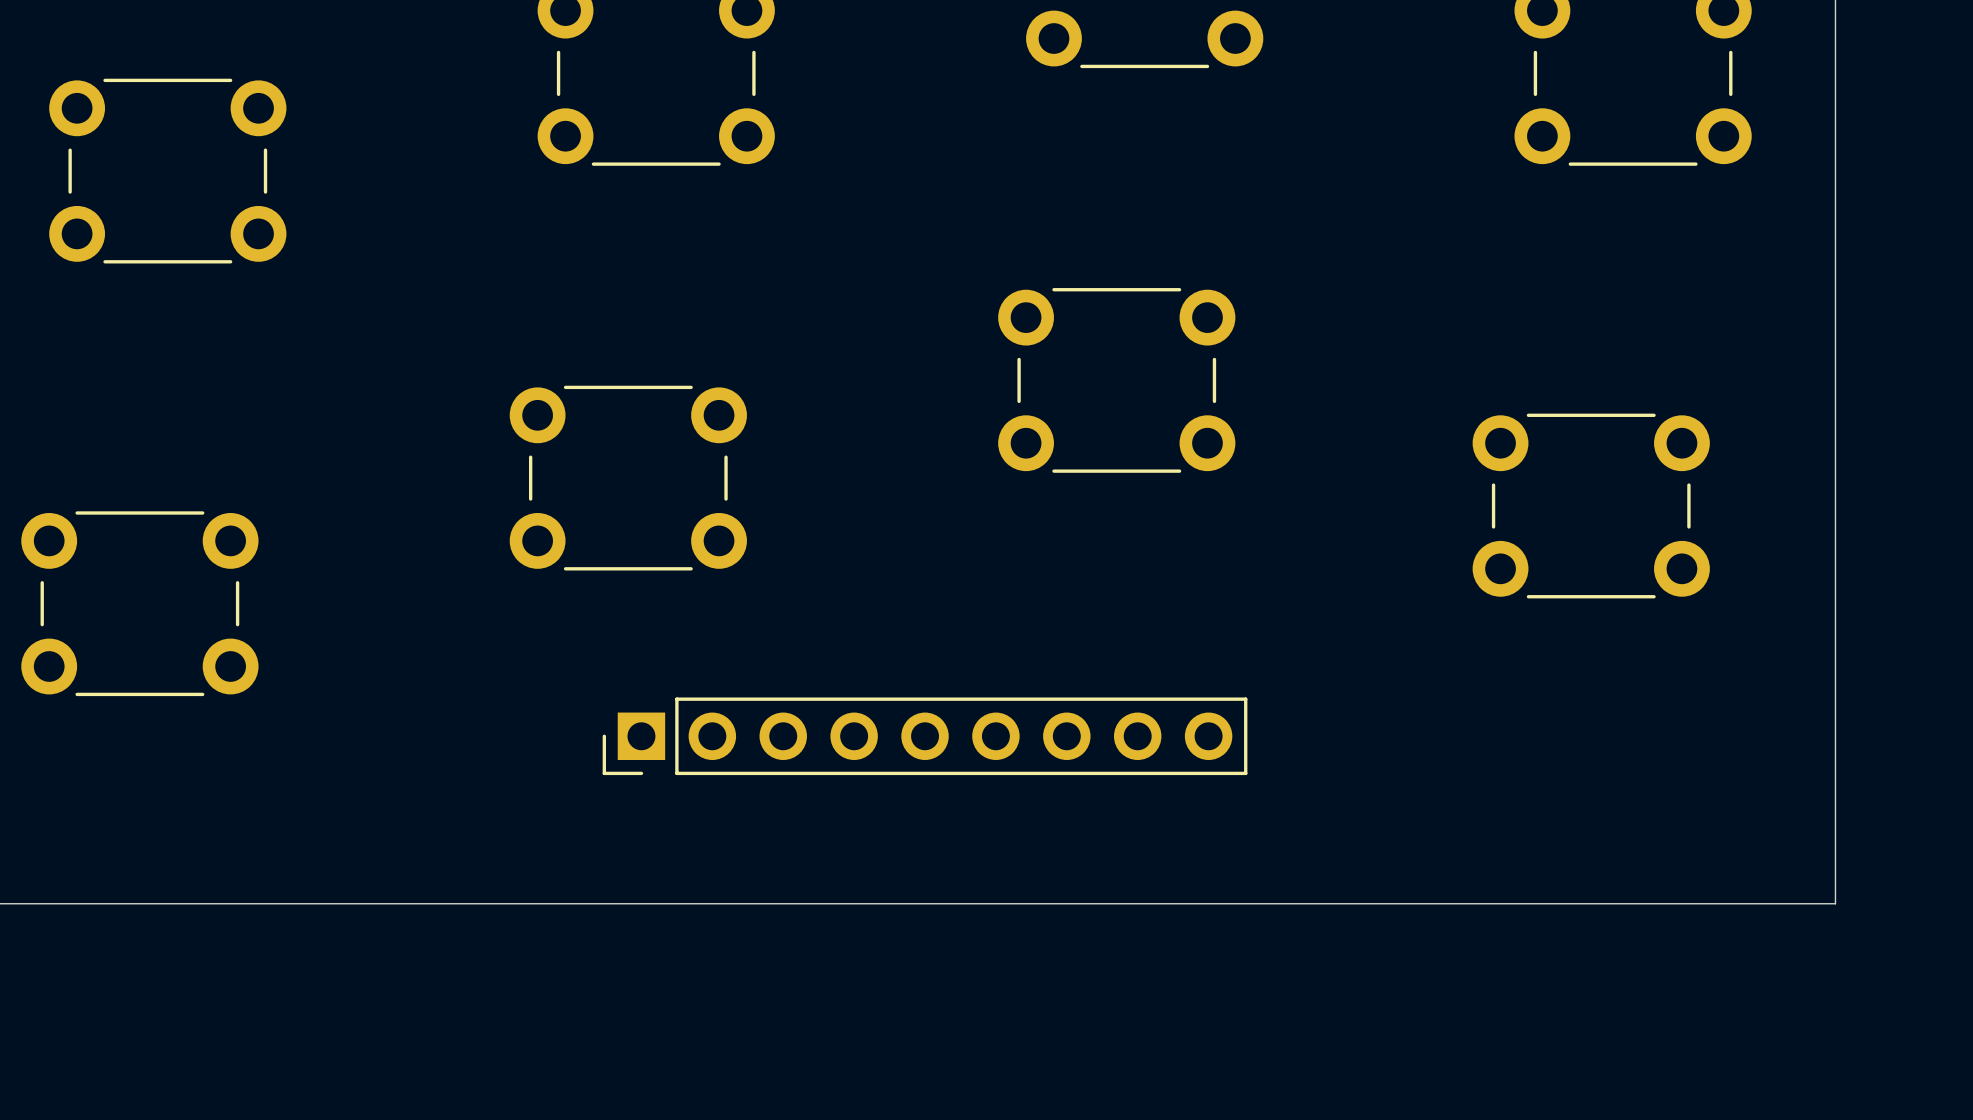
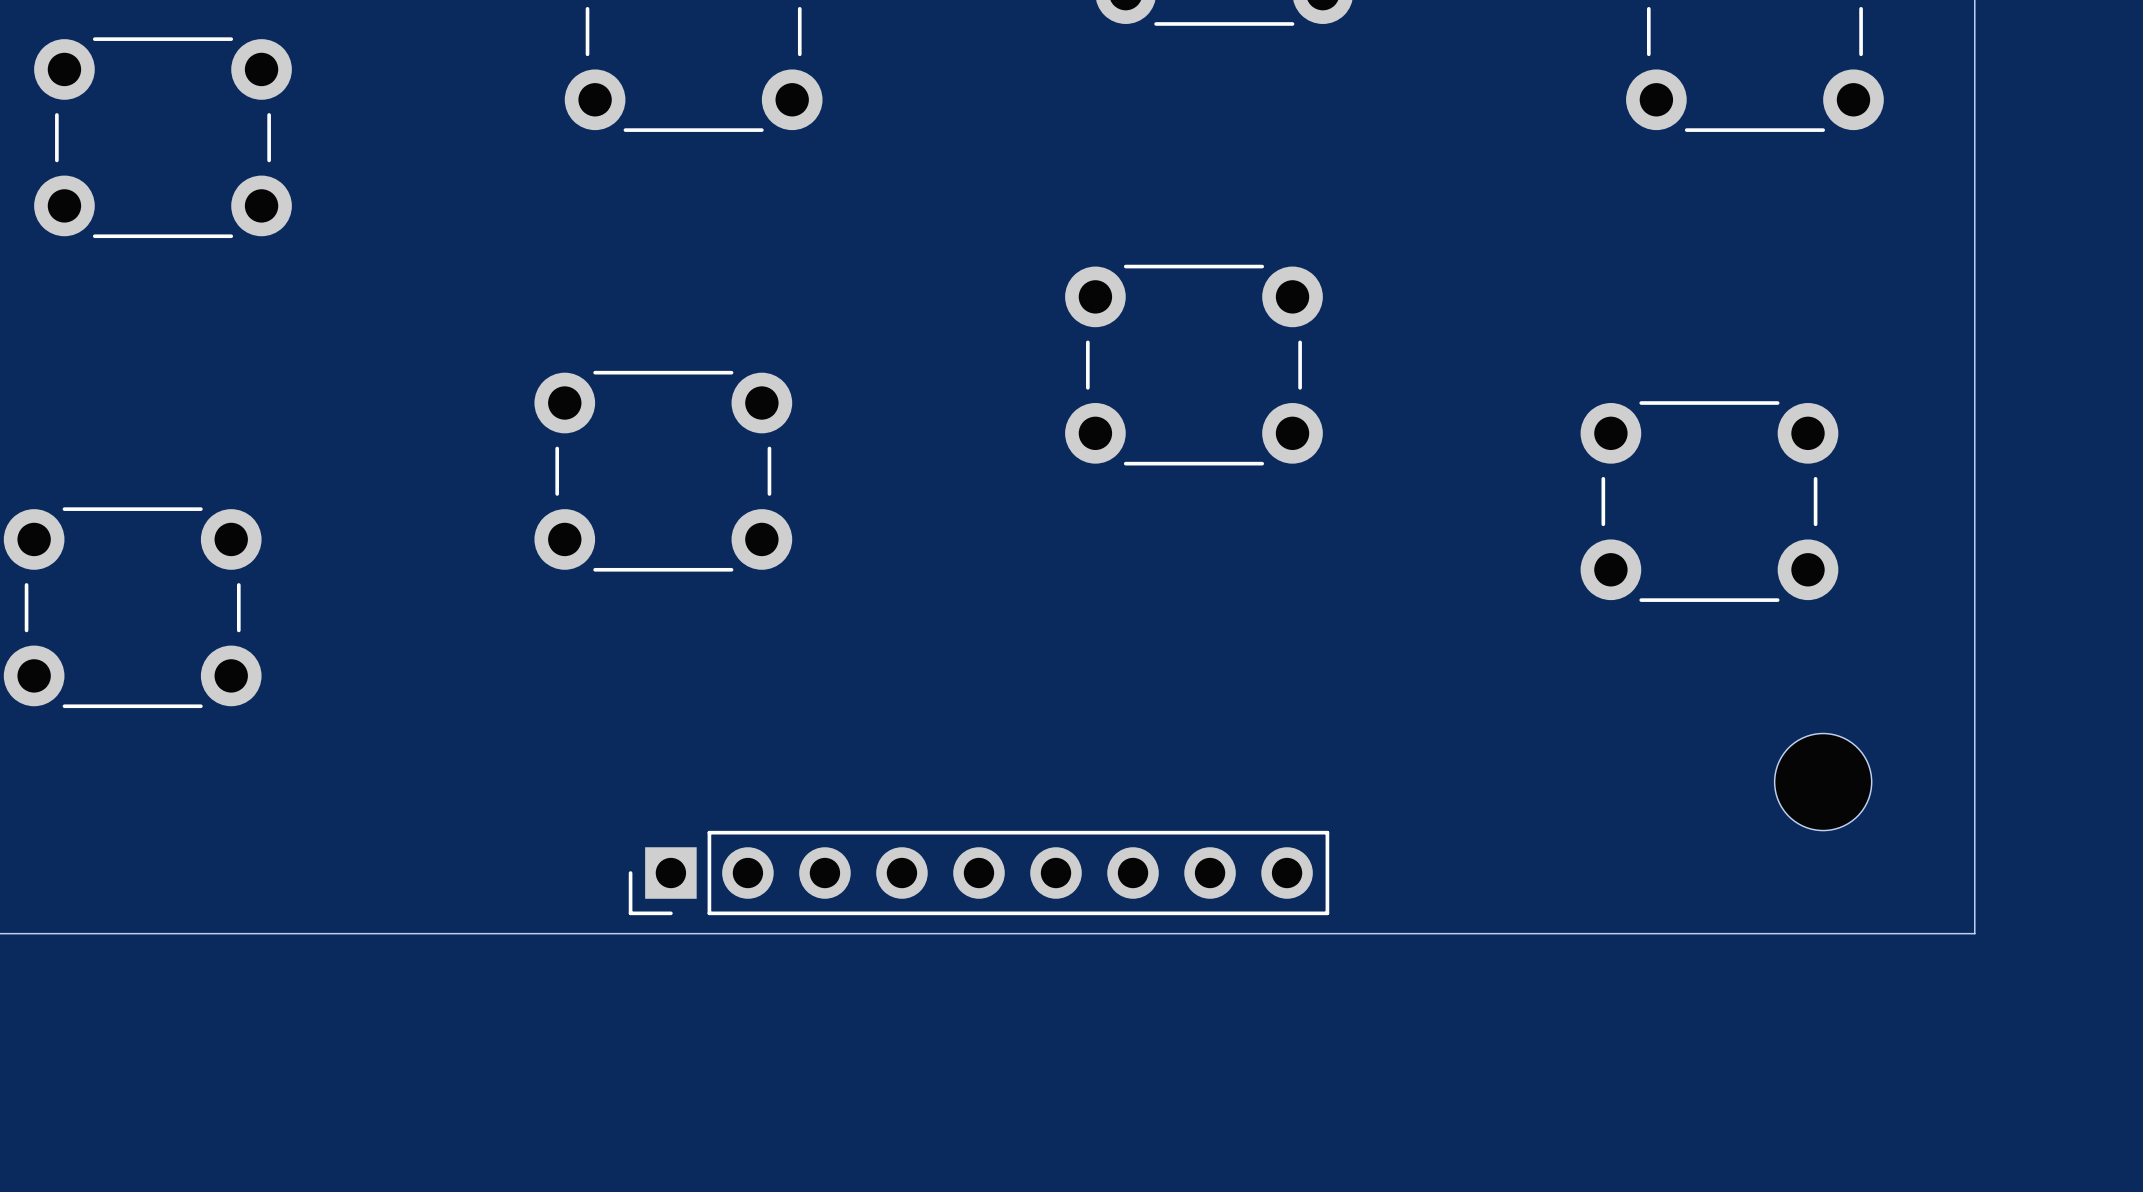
part position: (925, 736) -> (978, 873)
part: none -> (1823, 782)

